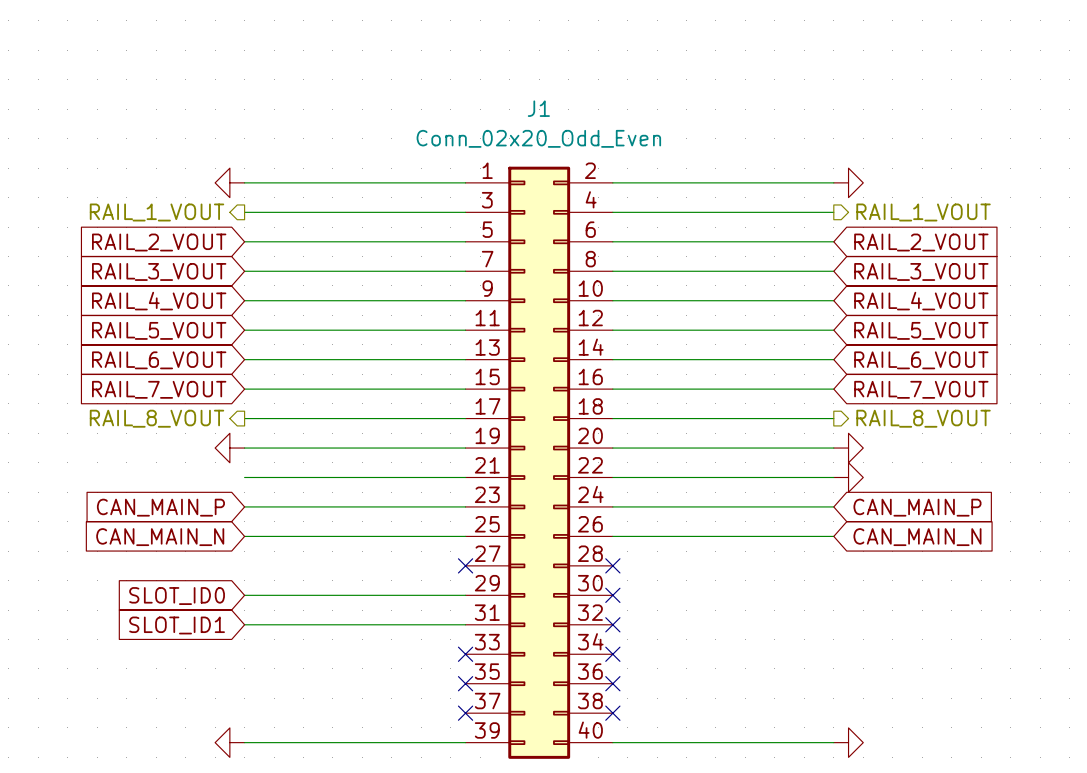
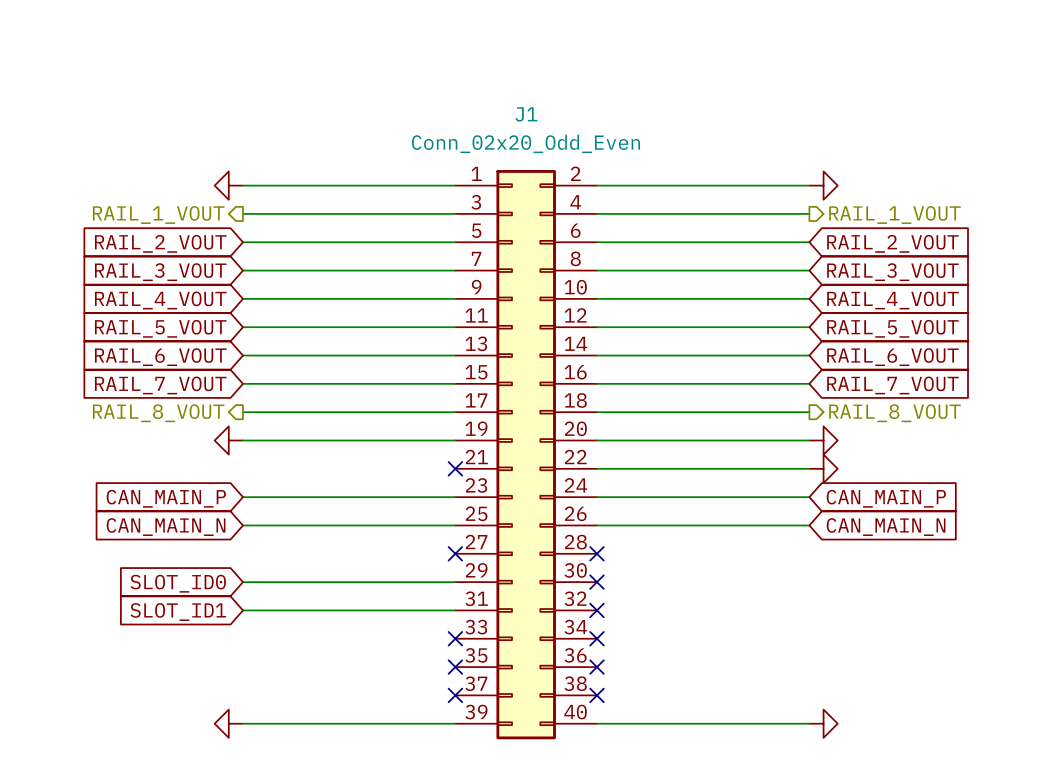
wire: (244, 477) (465, 477) -> none
no-connect mark: none -> (455, 468)

